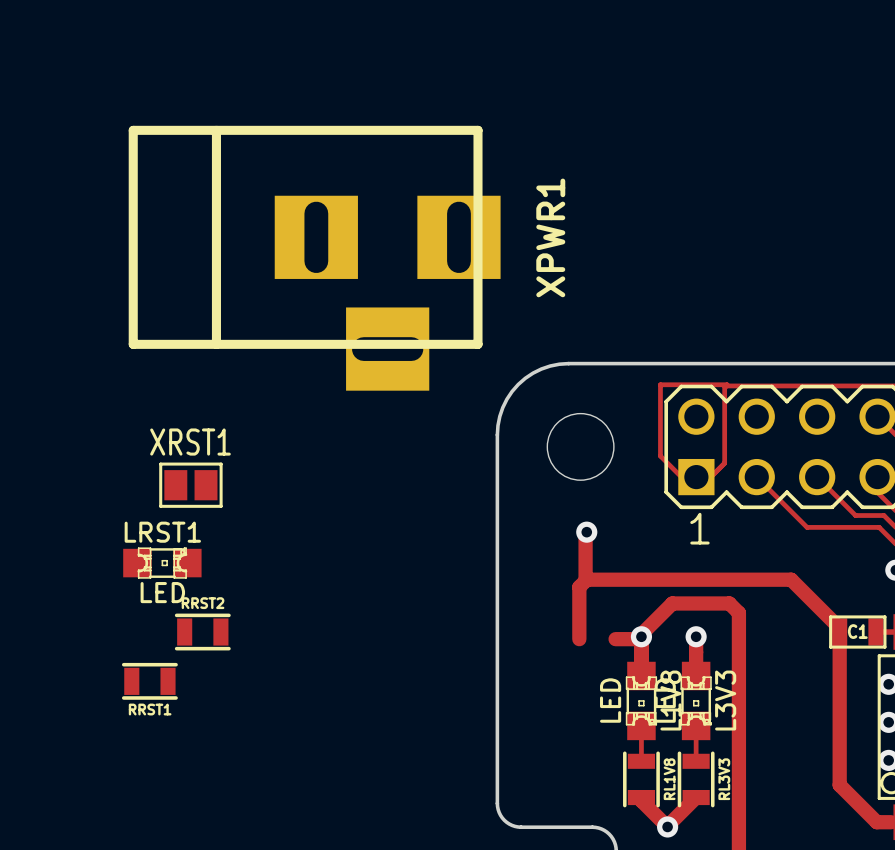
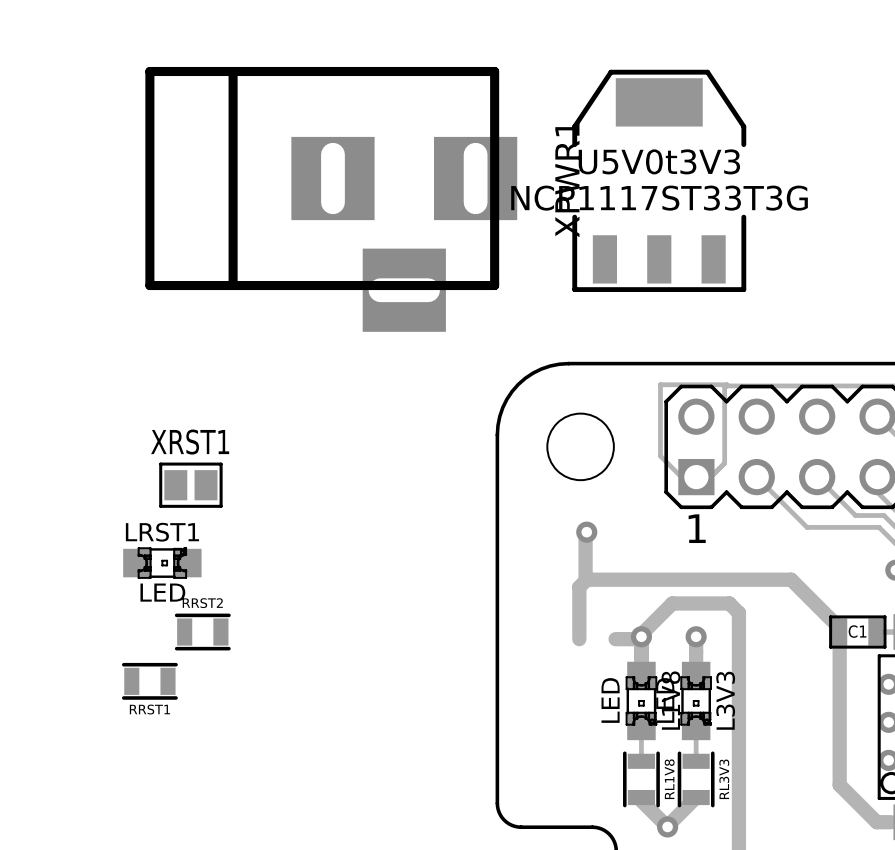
U5V0t3V3: none -> NCP1117ST33T3G (659, 180)
XPWR1 position: (314, 258) -> (331, 199)

